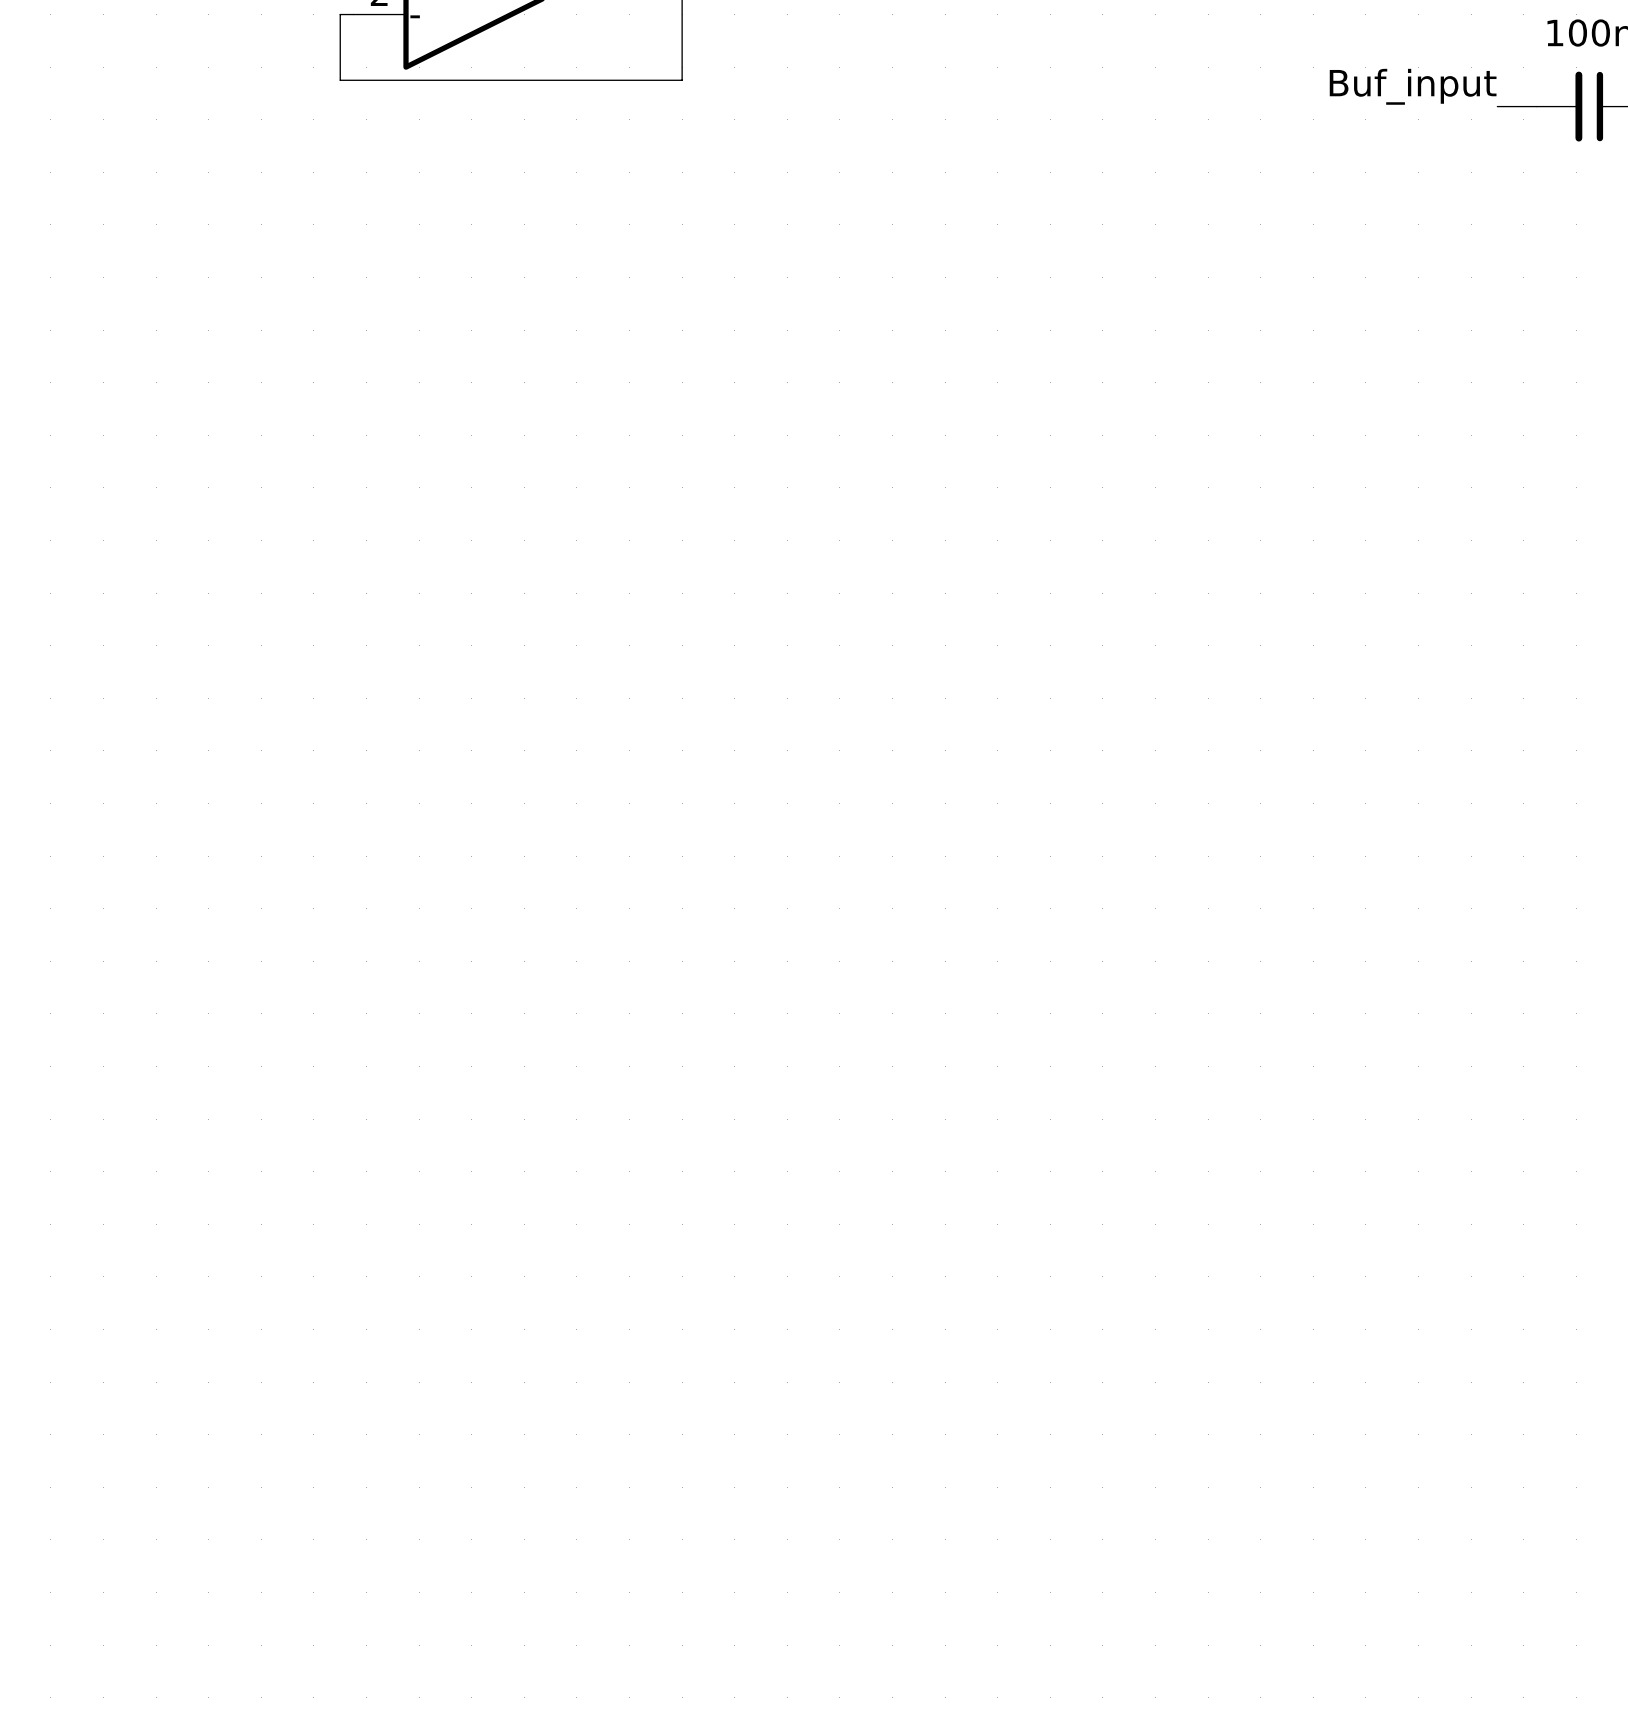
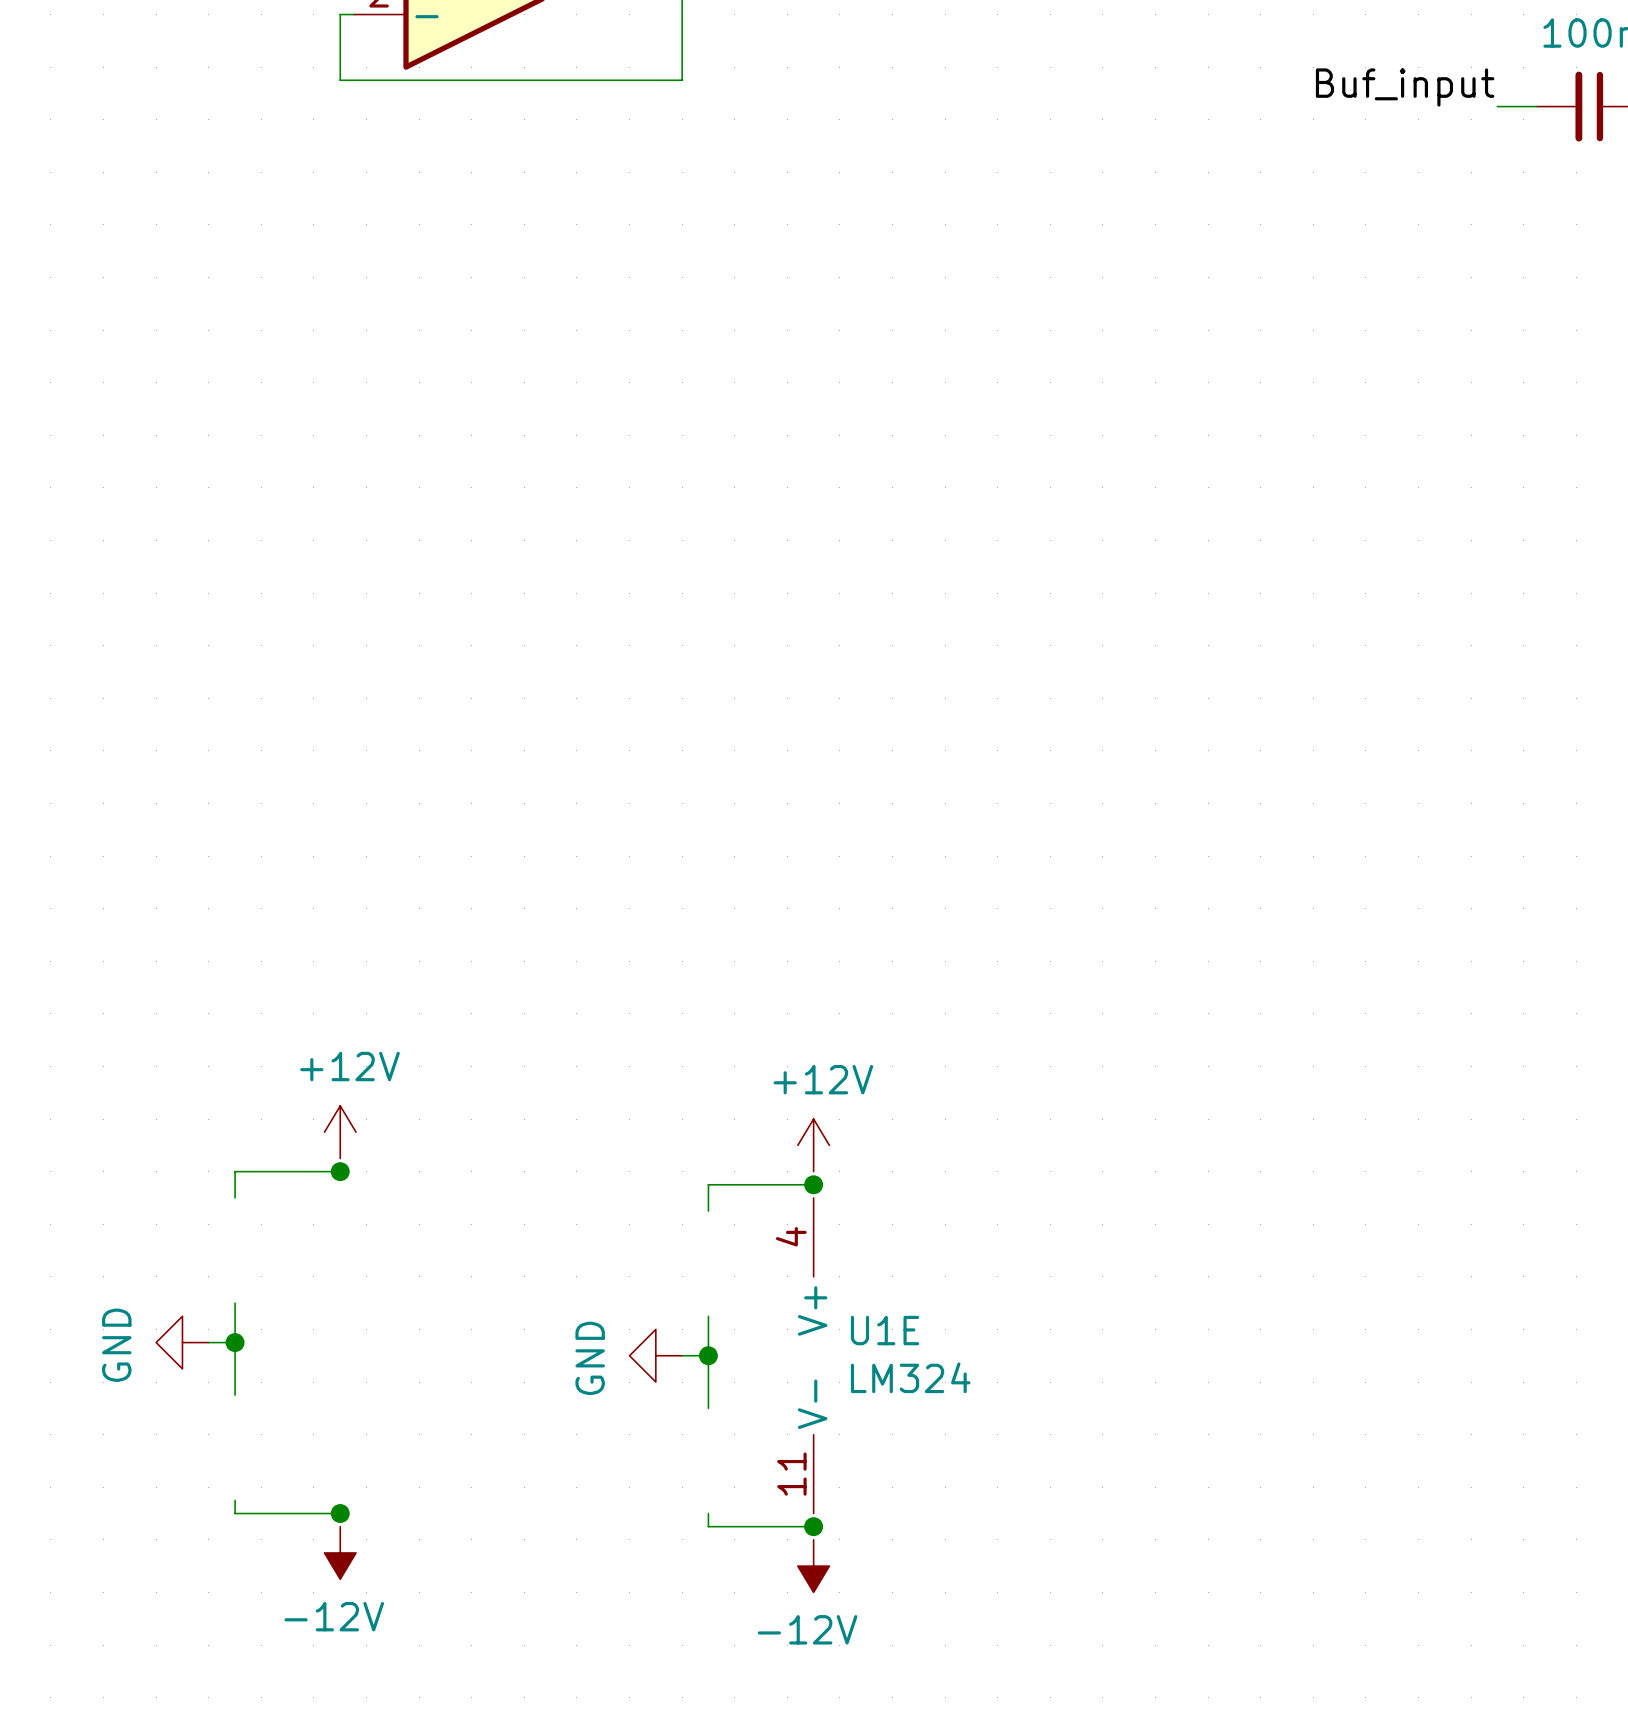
power symbol: none -> +12V (340, 1132)
power symbol: none -> +12V (813, 1145)
wire: none -> (340, 1171) (235, 1171) (235, 1197)
junction: none -> (340, 1171)
wire: none -> (813, 1184) (708, 1184) (708, 1211)
junction: none -> (813, 1184)
wire: none -> (235, 1303) (235, 1395)
wire: none -> (708, 1316) (708, 1408)
power symbol: none -> GND (182, 1342)
wire: none -> (208, 1342) (235, 1342)
junction: none -> (235, 1342)
power symbol: none -> GND (655, 1355)
wire: none -> (682, 1355) (708, 1355)
junction: none -> (708, 1355)
U1E: none -> LM324 (813, 1355)
wire: none -> (235, 1500) (235, 1513) (340, 1513)
junction: none -> (340, 1513)
wire: none -> (708, 1513) (708, 1526) (813, 1526)
junction: none -> (813, 1526)
power symbol: none -> -12V (340, 1552)
power symbol: none -> -12V (813, 1566)

